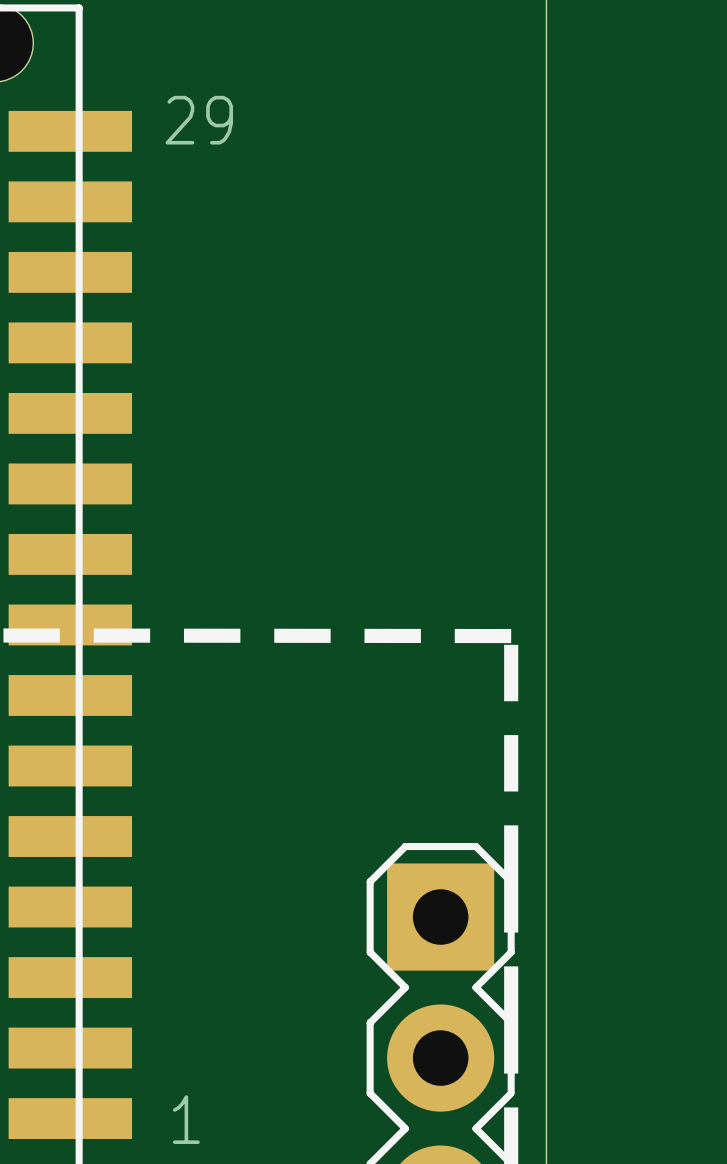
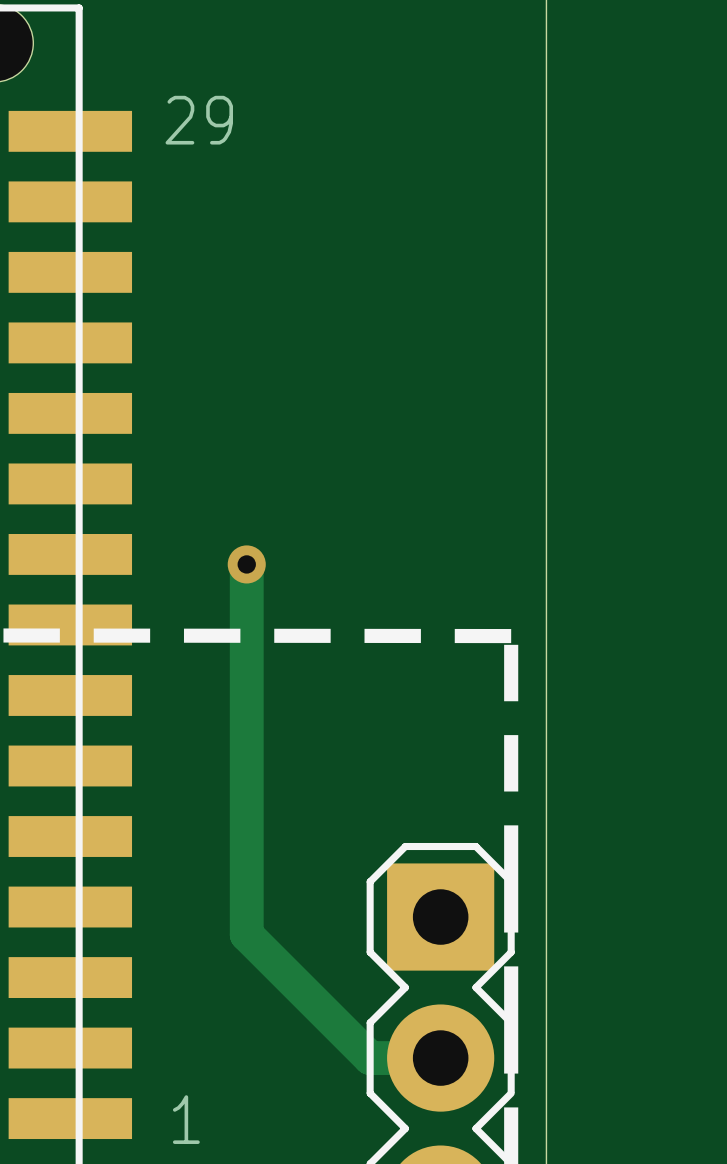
track: none -> (246, 564) (246, 934) (370, 1058) (440, 1058)
via: none -> (246, 564)

